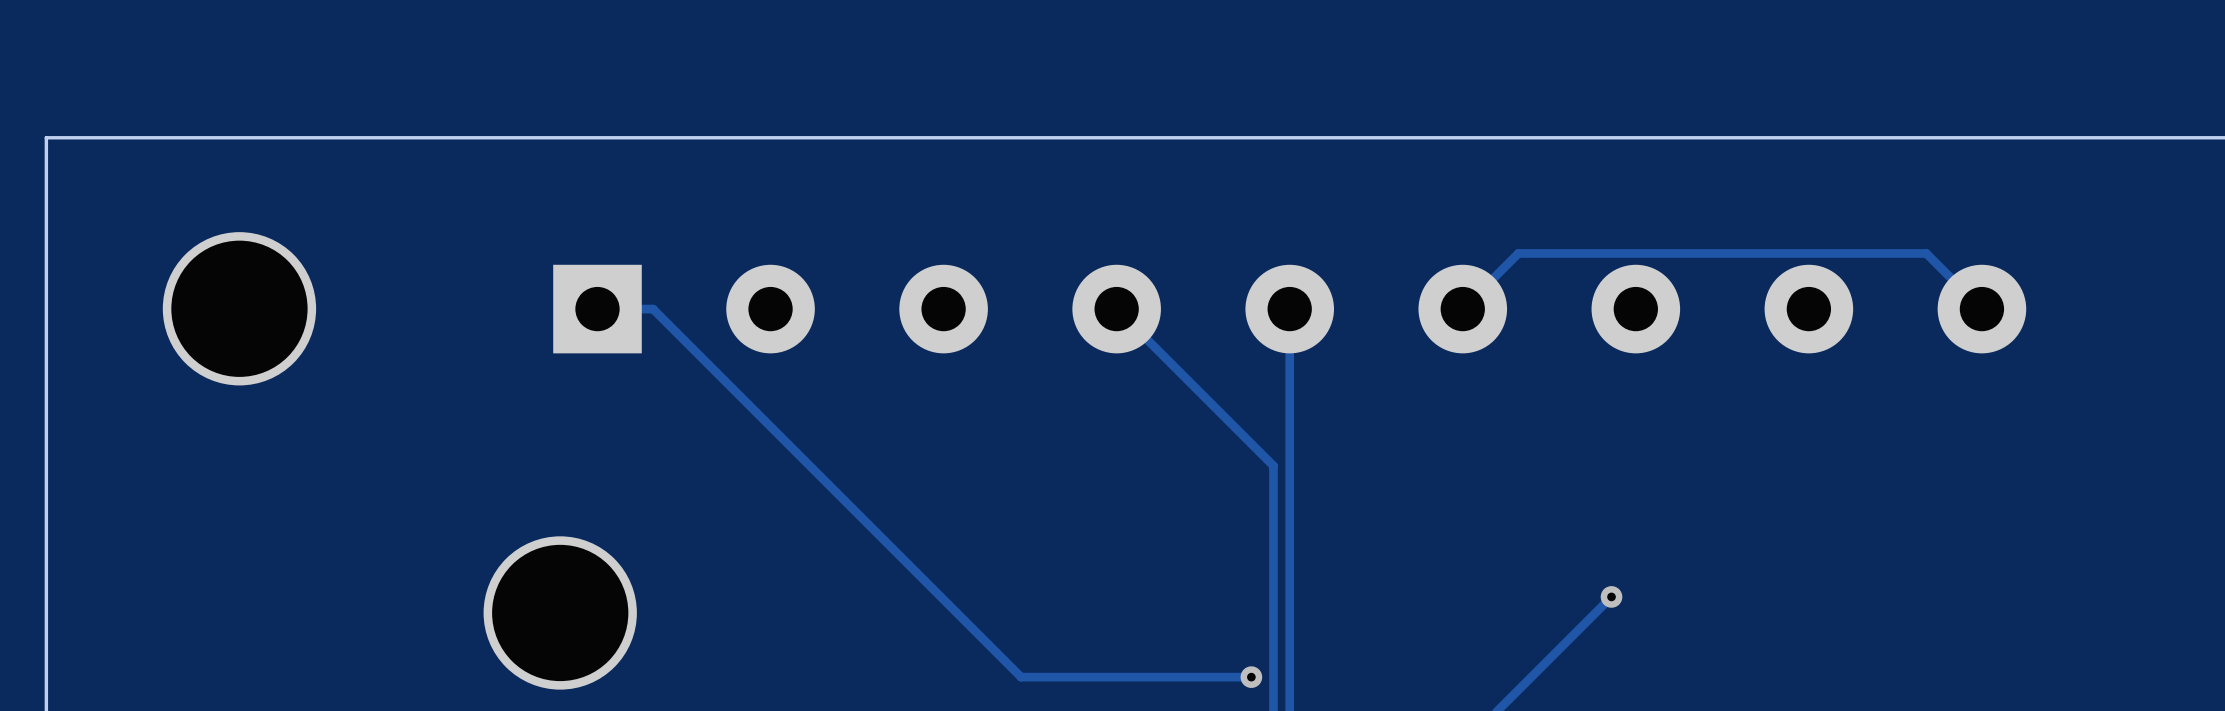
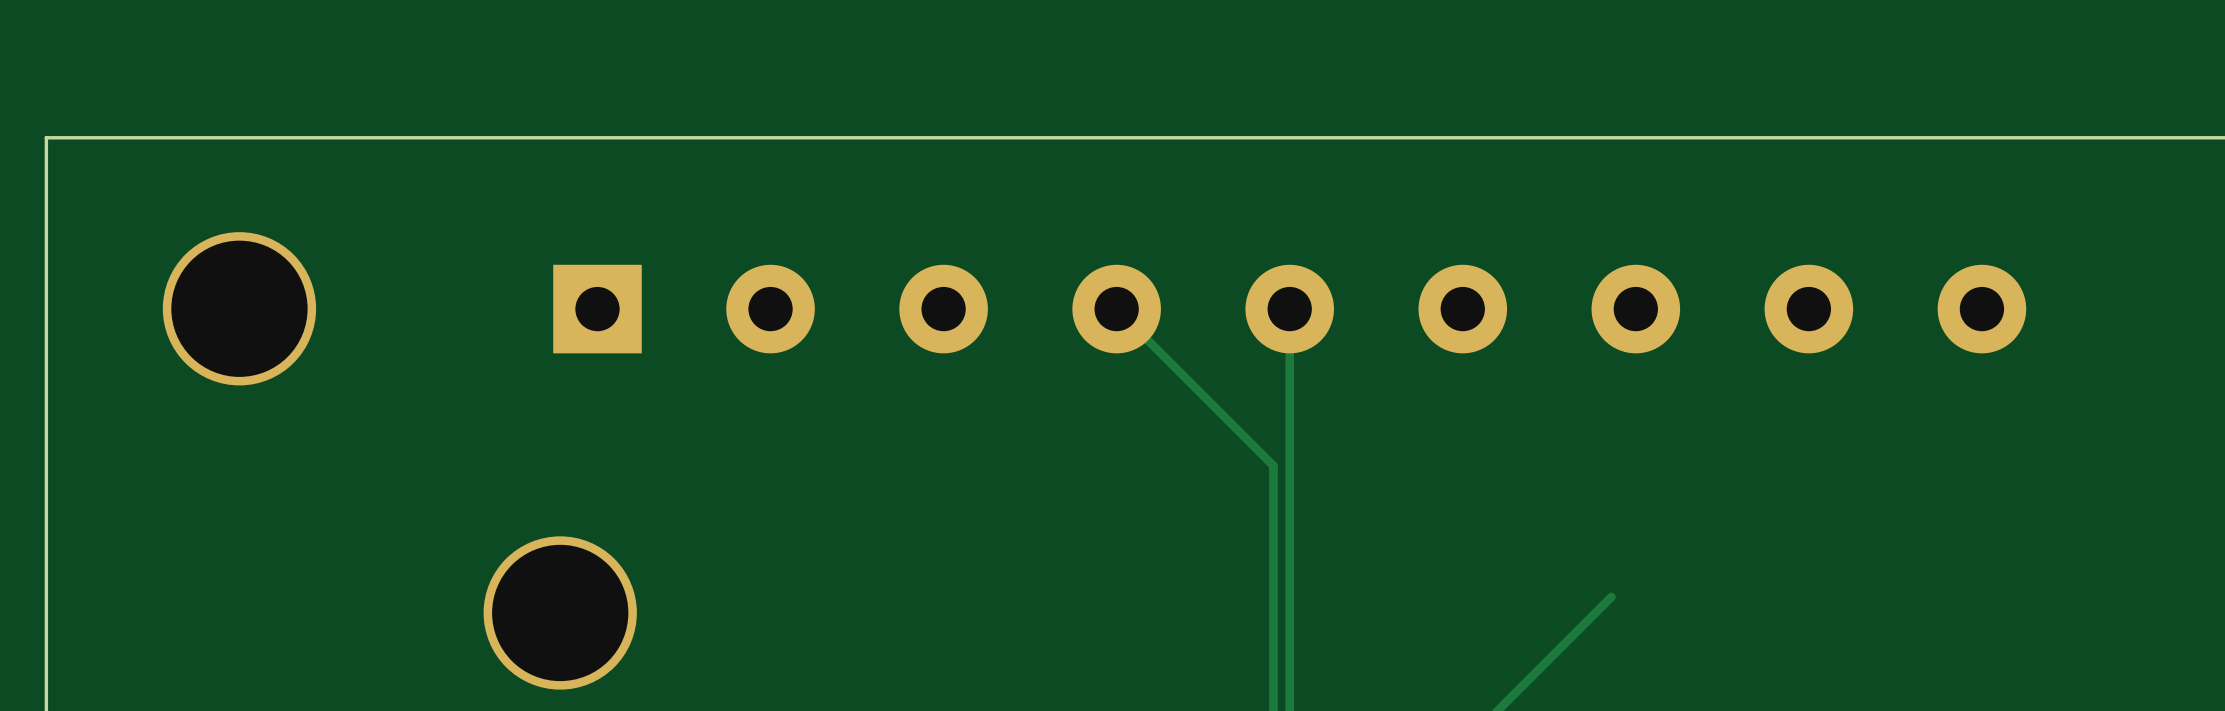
track: (597, 309) (653, 309) (1021, 677) (1251, 677) -> none
track: (1981, 309) (1926, 253) (1518, 253) (1462, 309) -> none
via: (1611, 596) -> none
via: (1251, 677) -> none

